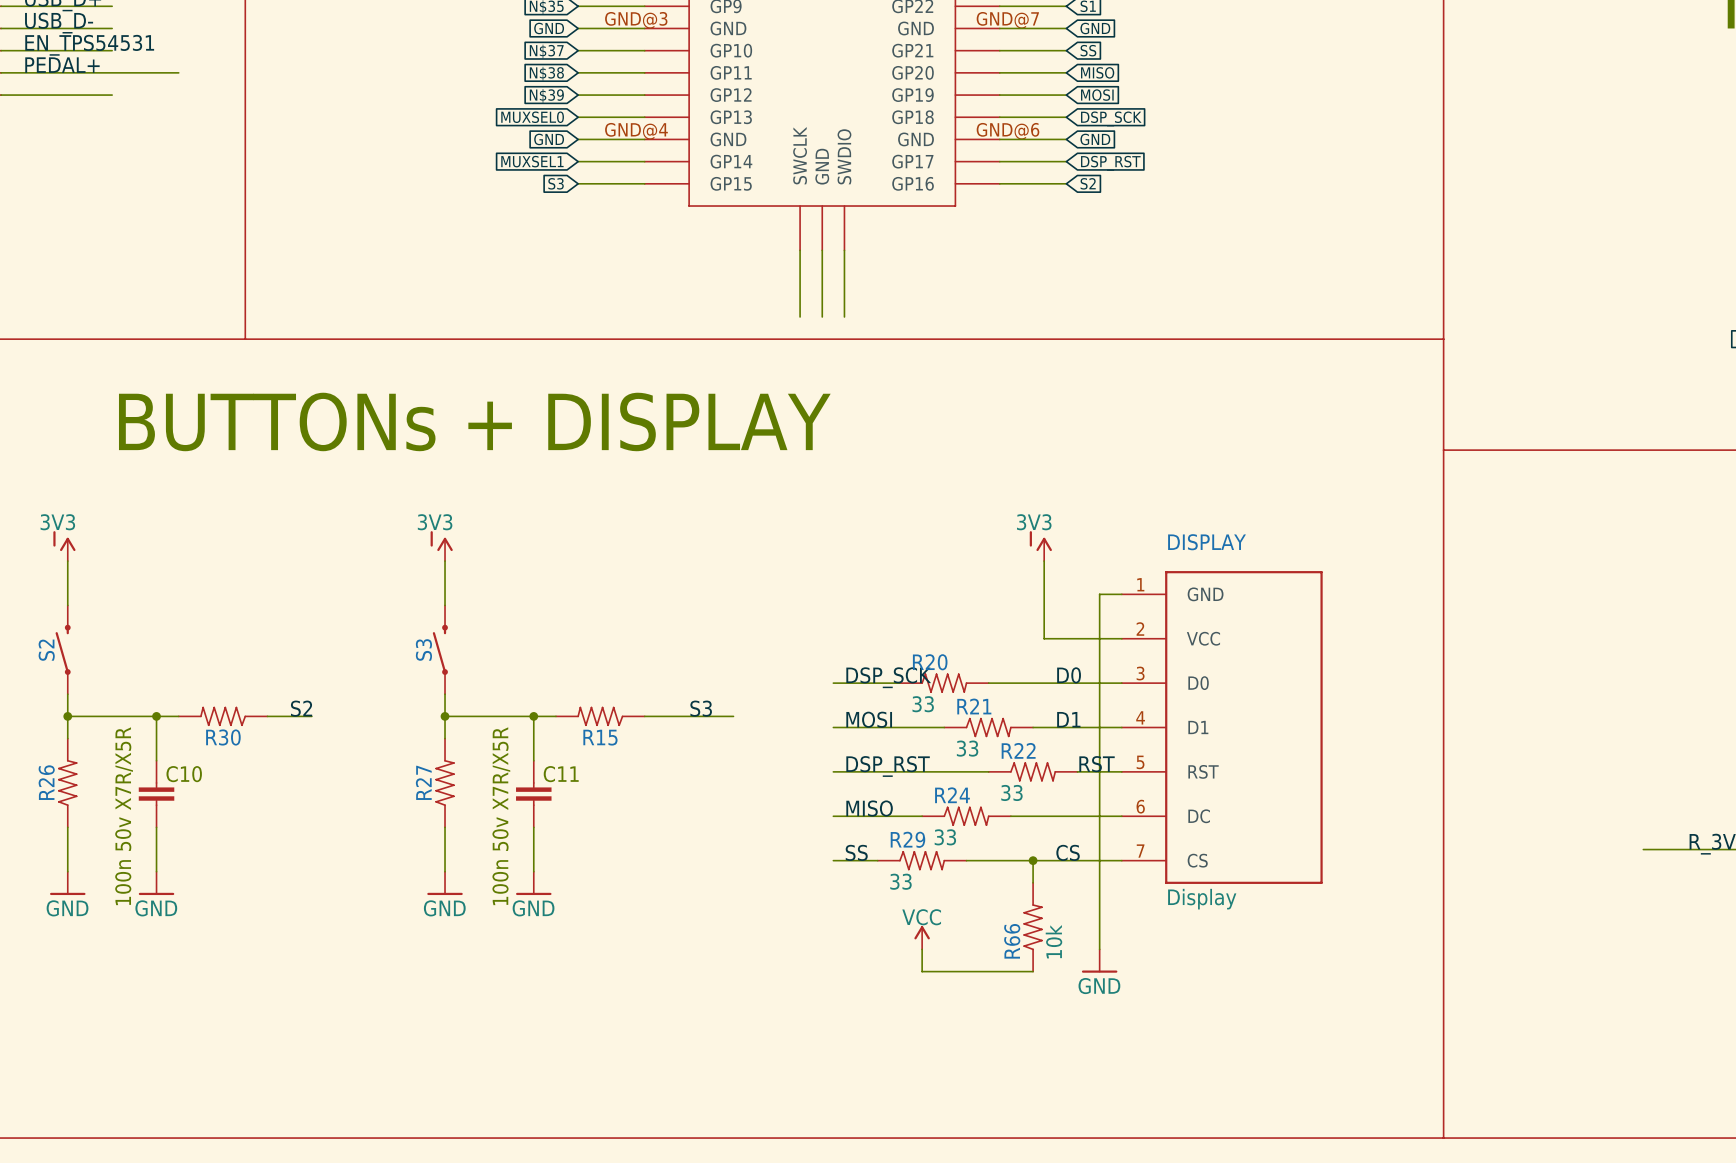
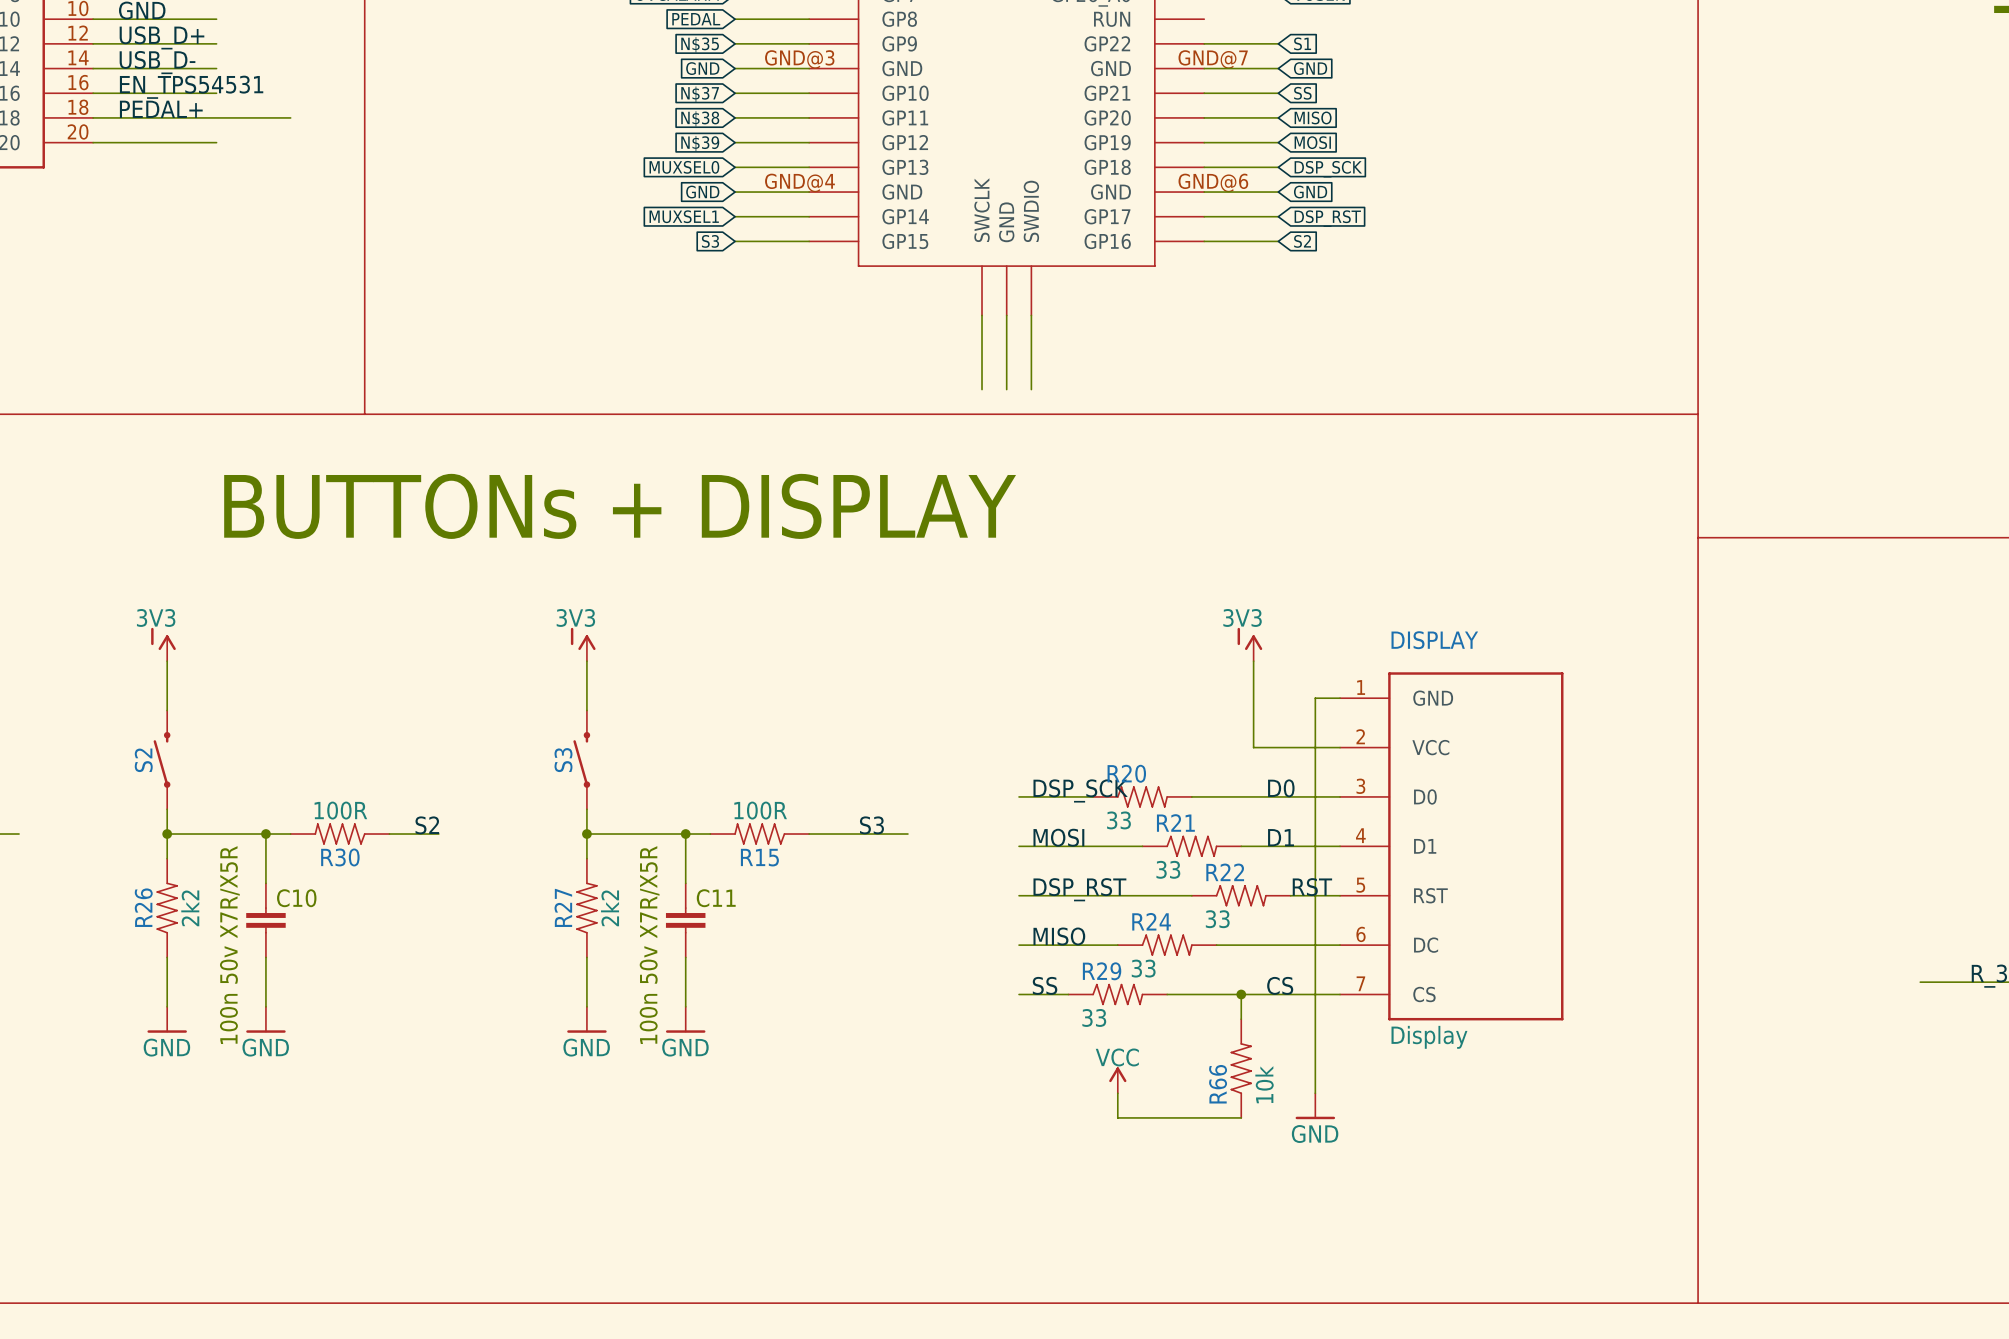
R30 value: none -> 100R (340, 810)
R15 value: none -> 100R (760, 810)
R26 value: none -> 2k2 (190, 908)
R27 value: none -> 2k2 (610, 908)

